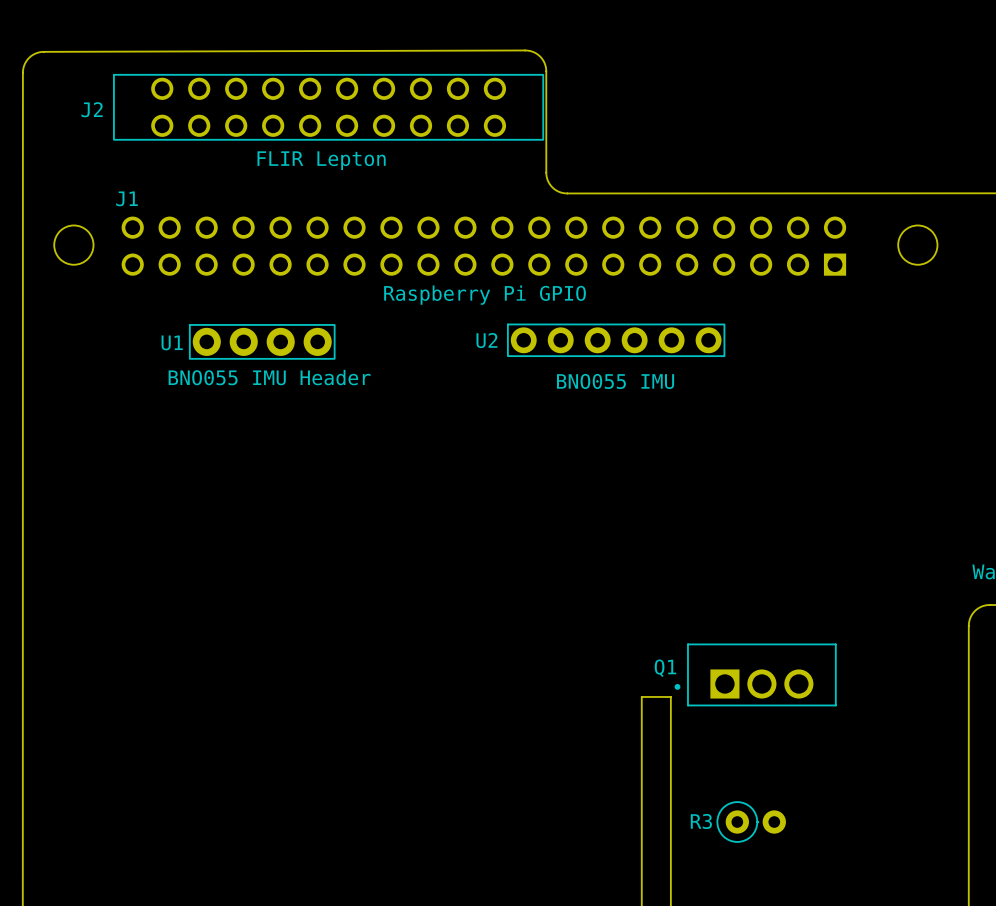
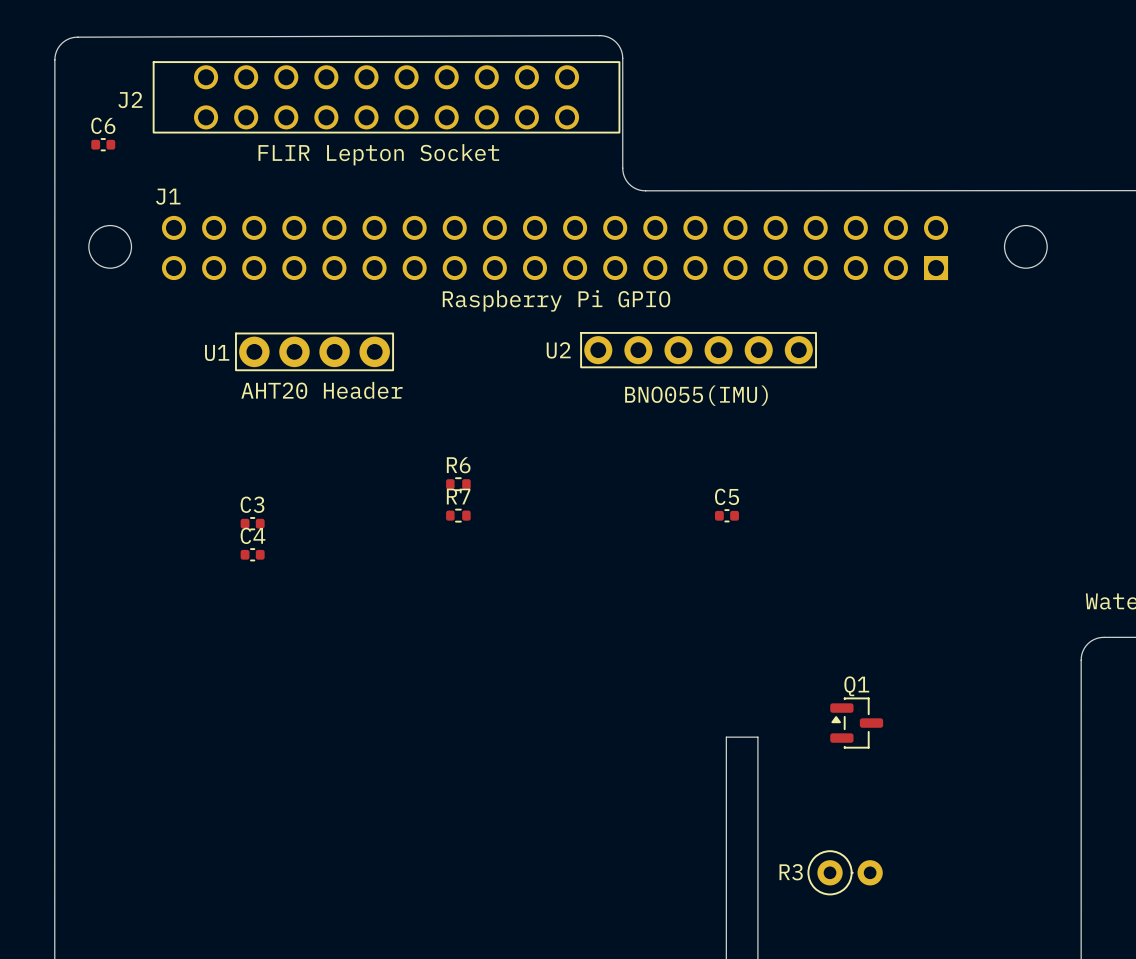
C6: none -> (103, 144)
J2 value: FLIR Lepton (321, 160) -> FLIR Lepton Socket (378, 154)
text: BNO055 IMU Header (269, 377) -> AHT20 Header (321, 390)
U2 value: BNO055 IMU (615, 381) -> BNO055(IMU) (696, 395)
R6: none -> (458, 484)
R7: none -> (458, 515)
C5: none -> (726, 515)
C3: none -> (252, 523)
C4: none -> (252, 554)
Q1 footprint: [674, 643, 837, 707] -> [830, 697, 884, 749]
Q1 name position: Q1 (665, 668) -> Q1 (856, 686)

